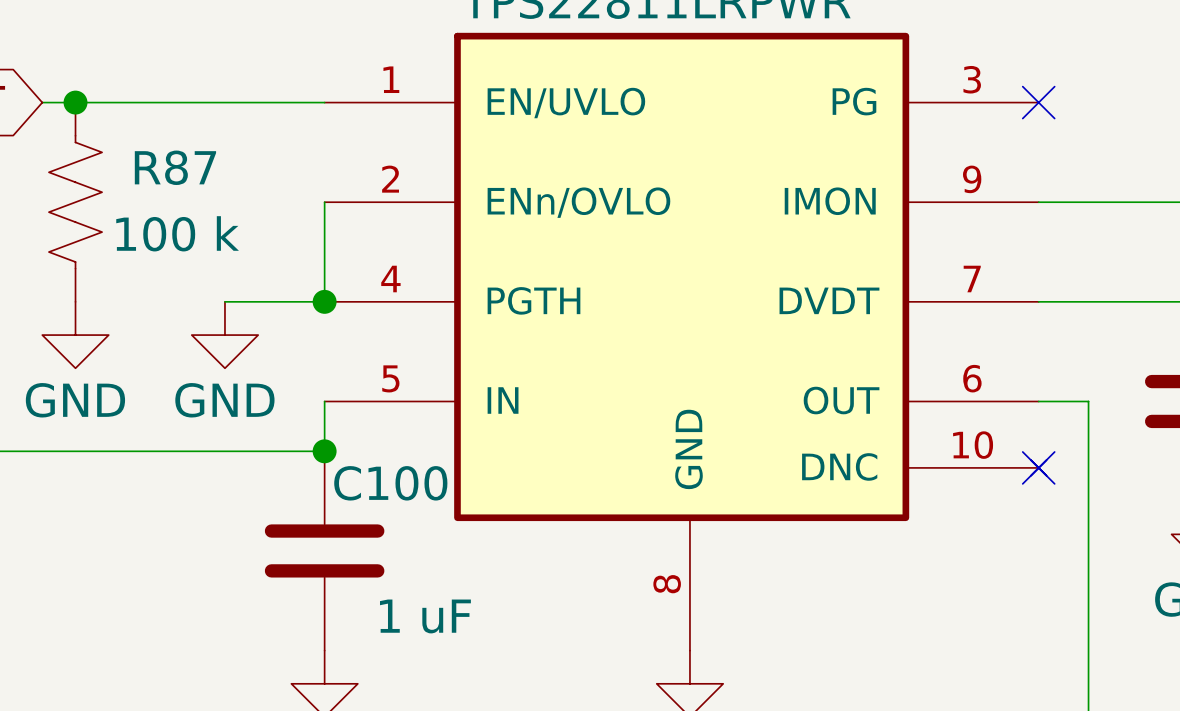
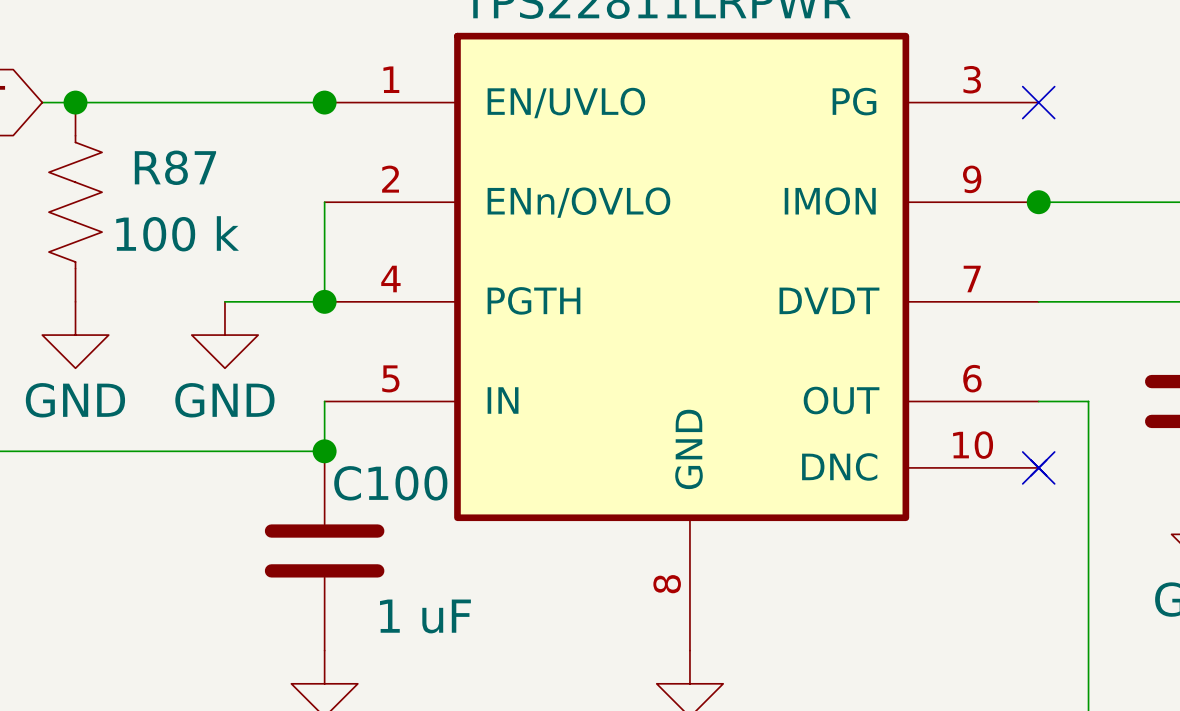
junction: none -> (324, 102)
junction: none -> (1038, 202)

